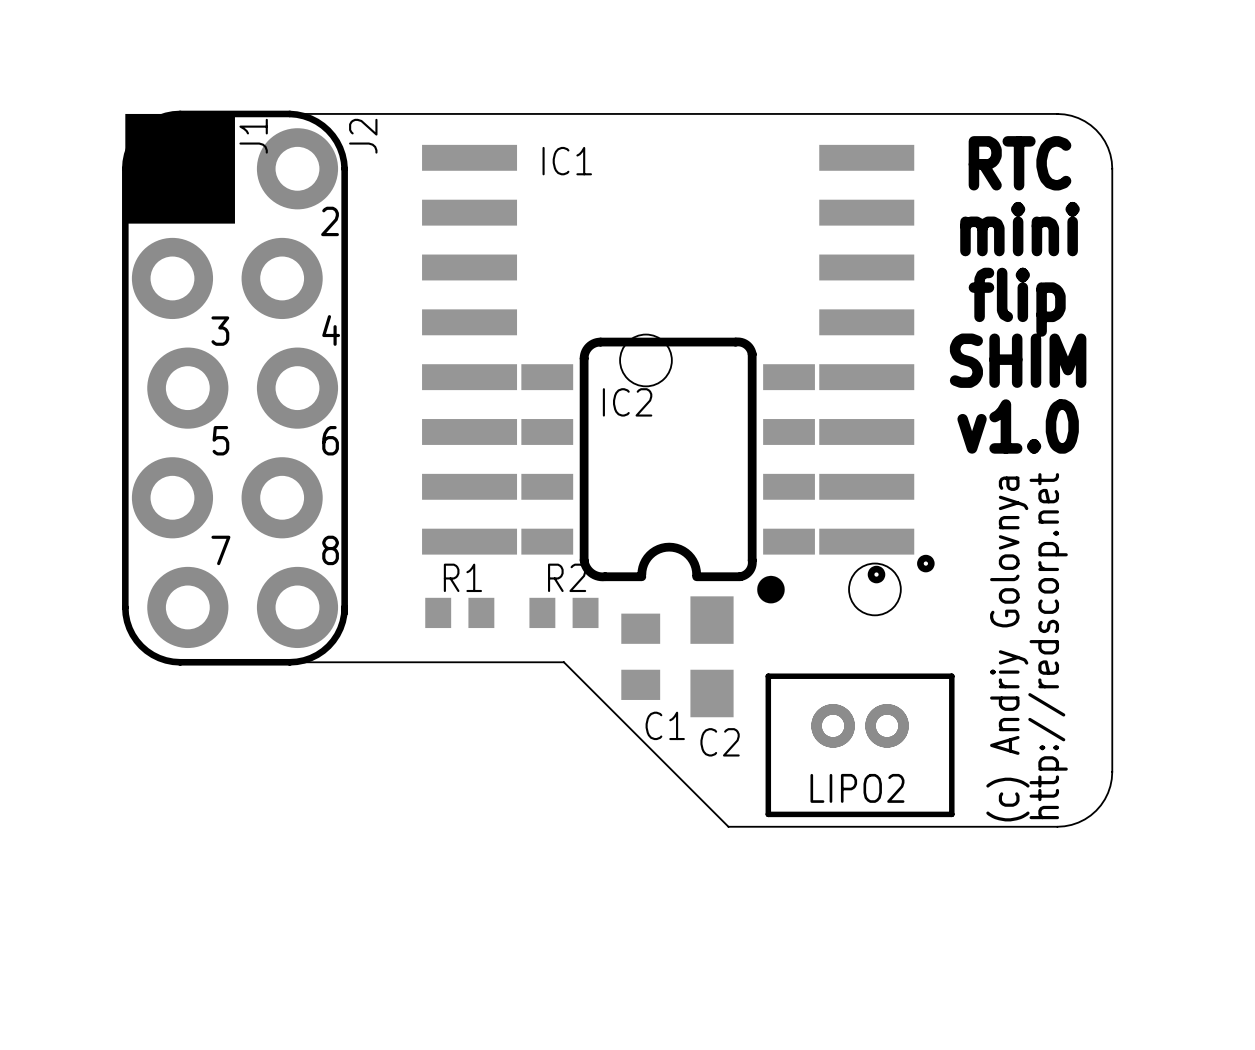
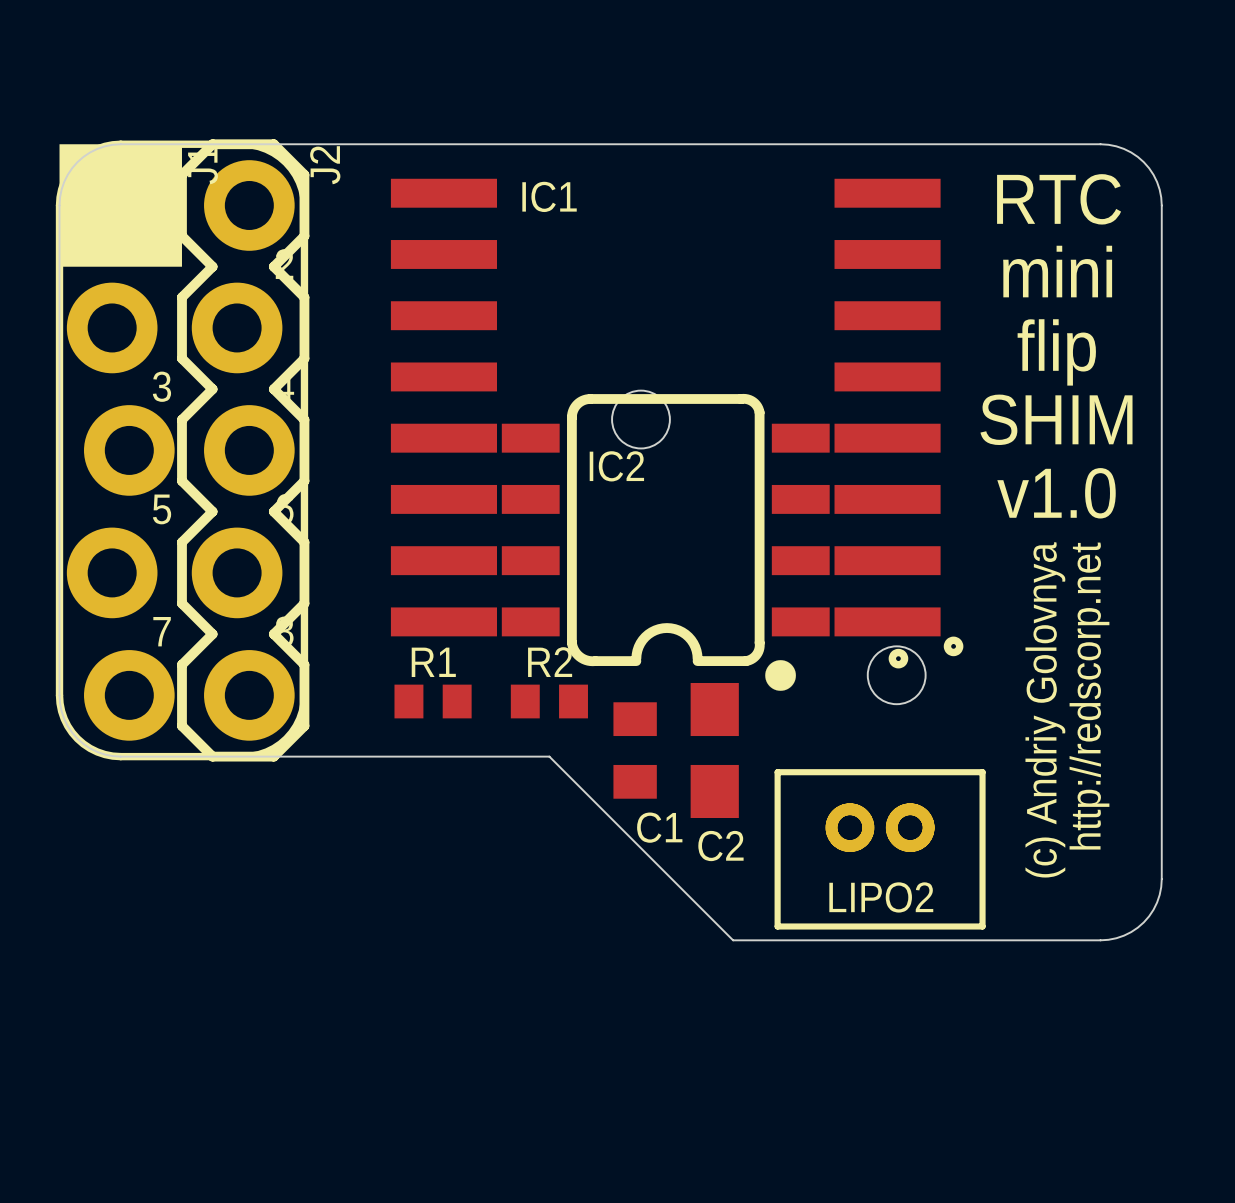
J2 footprint: [241, 128, 339, 649] -> [177, 139, 310, 762]

